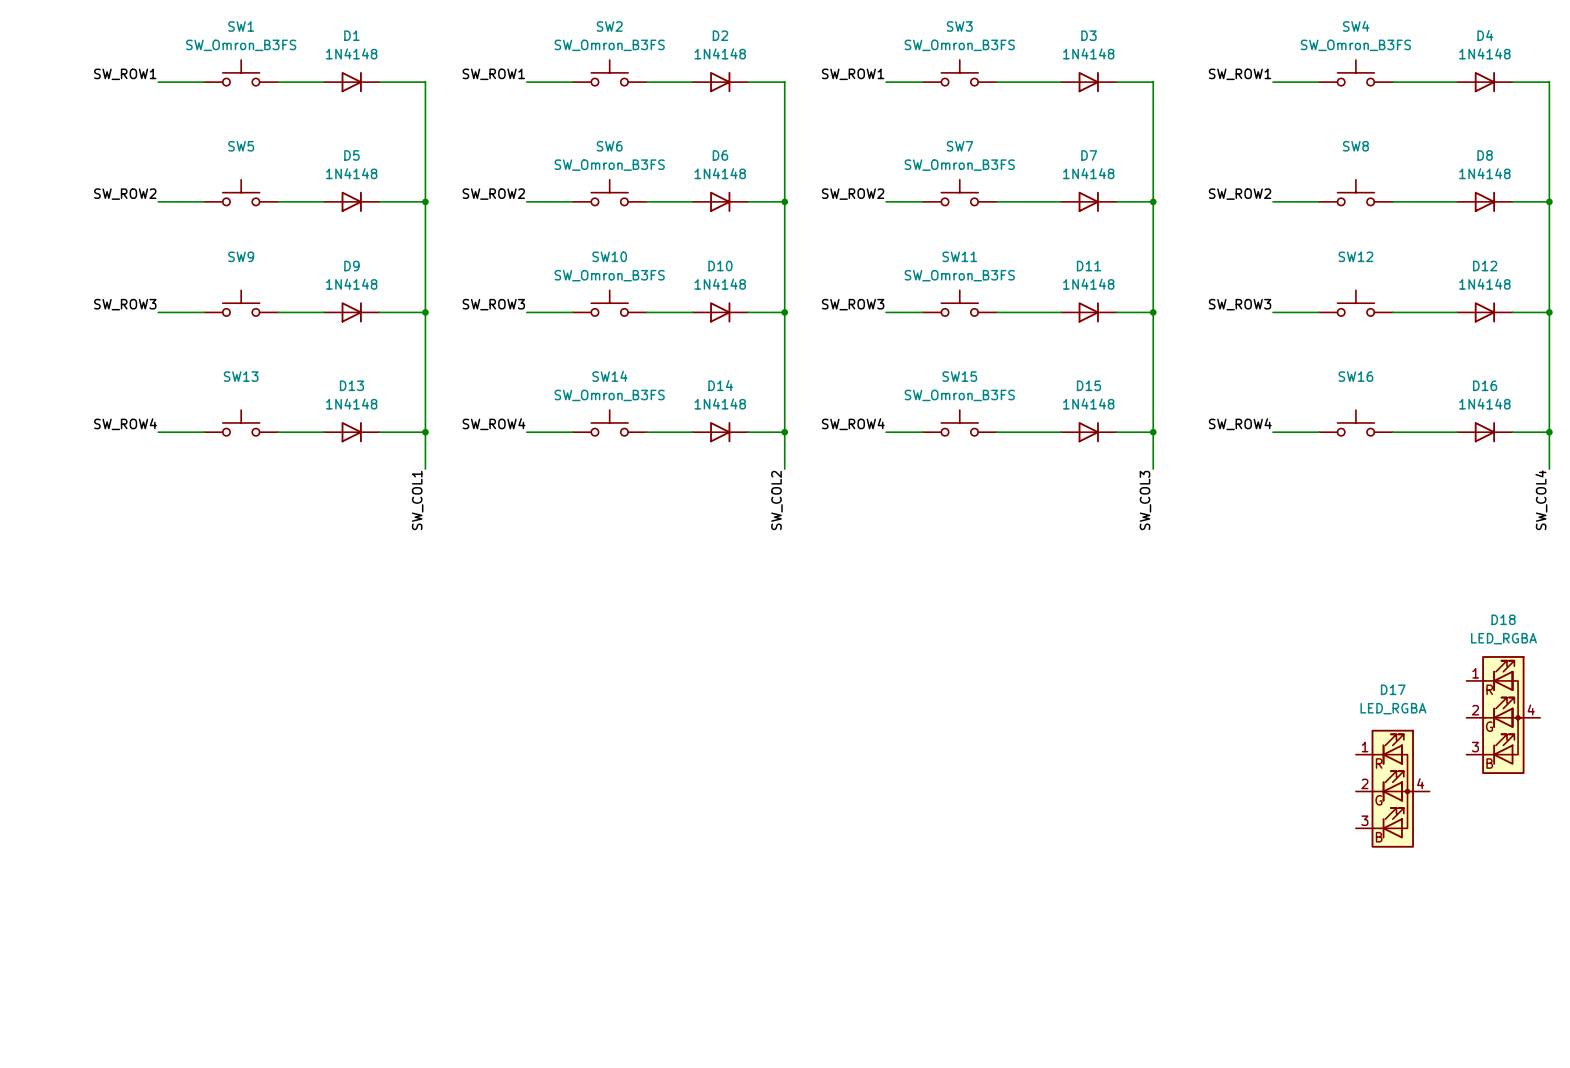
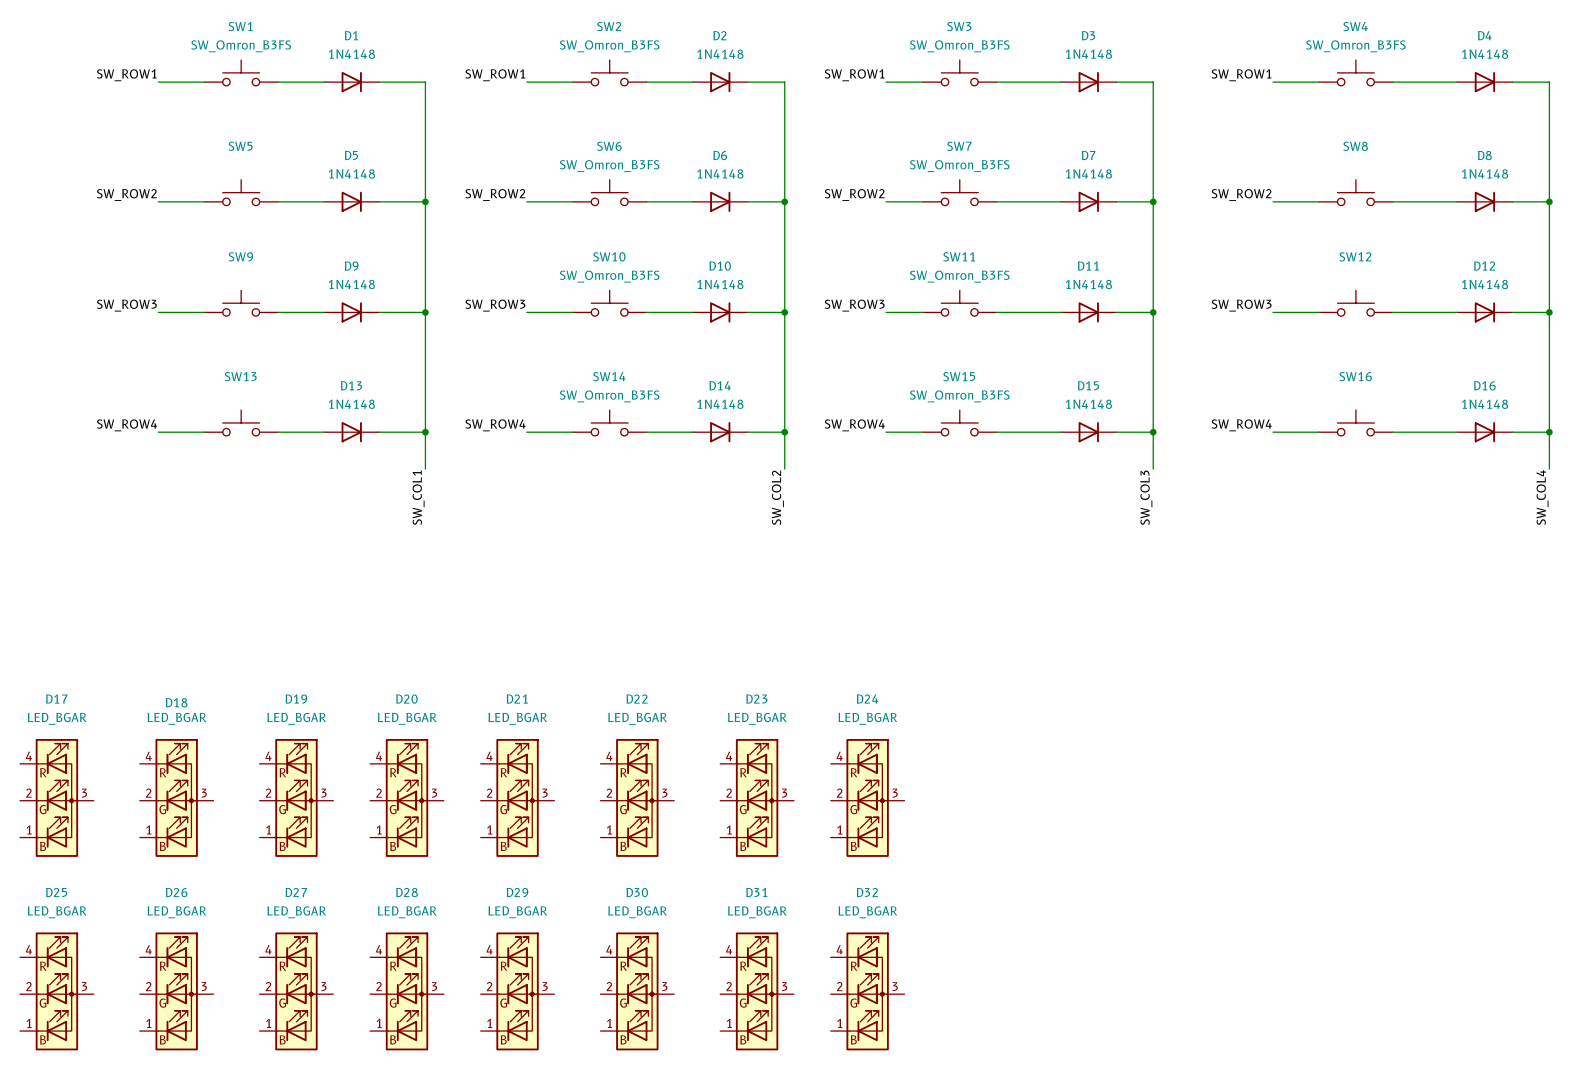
D18 value: LED_RGBA (1503, 638) -> LED_BGAR (176, 718)
D18 pin number: 1 (1475, 673) -> 4 (148, 756)
D17 value: LED_RGBA (1393, 708) -> LED_BGAR (57, 718)
D18 pin number: 4 (1531, 709) -> 3 (204, 793)
D18 position: (1503, 715) -> (176, 797)
D17 pin number: 1 (1365, 747) -> 4 (28, 756)
D18 pin number: 3 (1475, 747) -> 1 (148, 829)
D17 pin number: 4 (1420, 783) -> 3 (84, 793)
D17 position: (1392, 788) -> (56, 797)
D19: none -> LED_BGAR (296, 797)
D20: none -> LED_BGAR (407, 797)
D21: none -> LED_BGAR (517, 797)
D22: none -> LED_BGAR (637, 797)
D23: none -> LED_BGAR (757, 797)
D24: none -> LED_BGAR (867, 797)
D17 pin number: 3 (1364, 820) -> 1 (29, 829)
D25: none -> LED_BGAR (56, 991)
D26: none -> LED_BGAR (176, 991)
D27: none -> LED_BGAR (296, 991)
D28: none -> LED_BGAR (407, 991)
D29: none -> LED_BGAR (517, 991)
D30: none -> LED_BGAR (637, 991)
D31: none -> LED_BGAR (757, 991)
D32: none -> LED_BGAR (867, 991)

